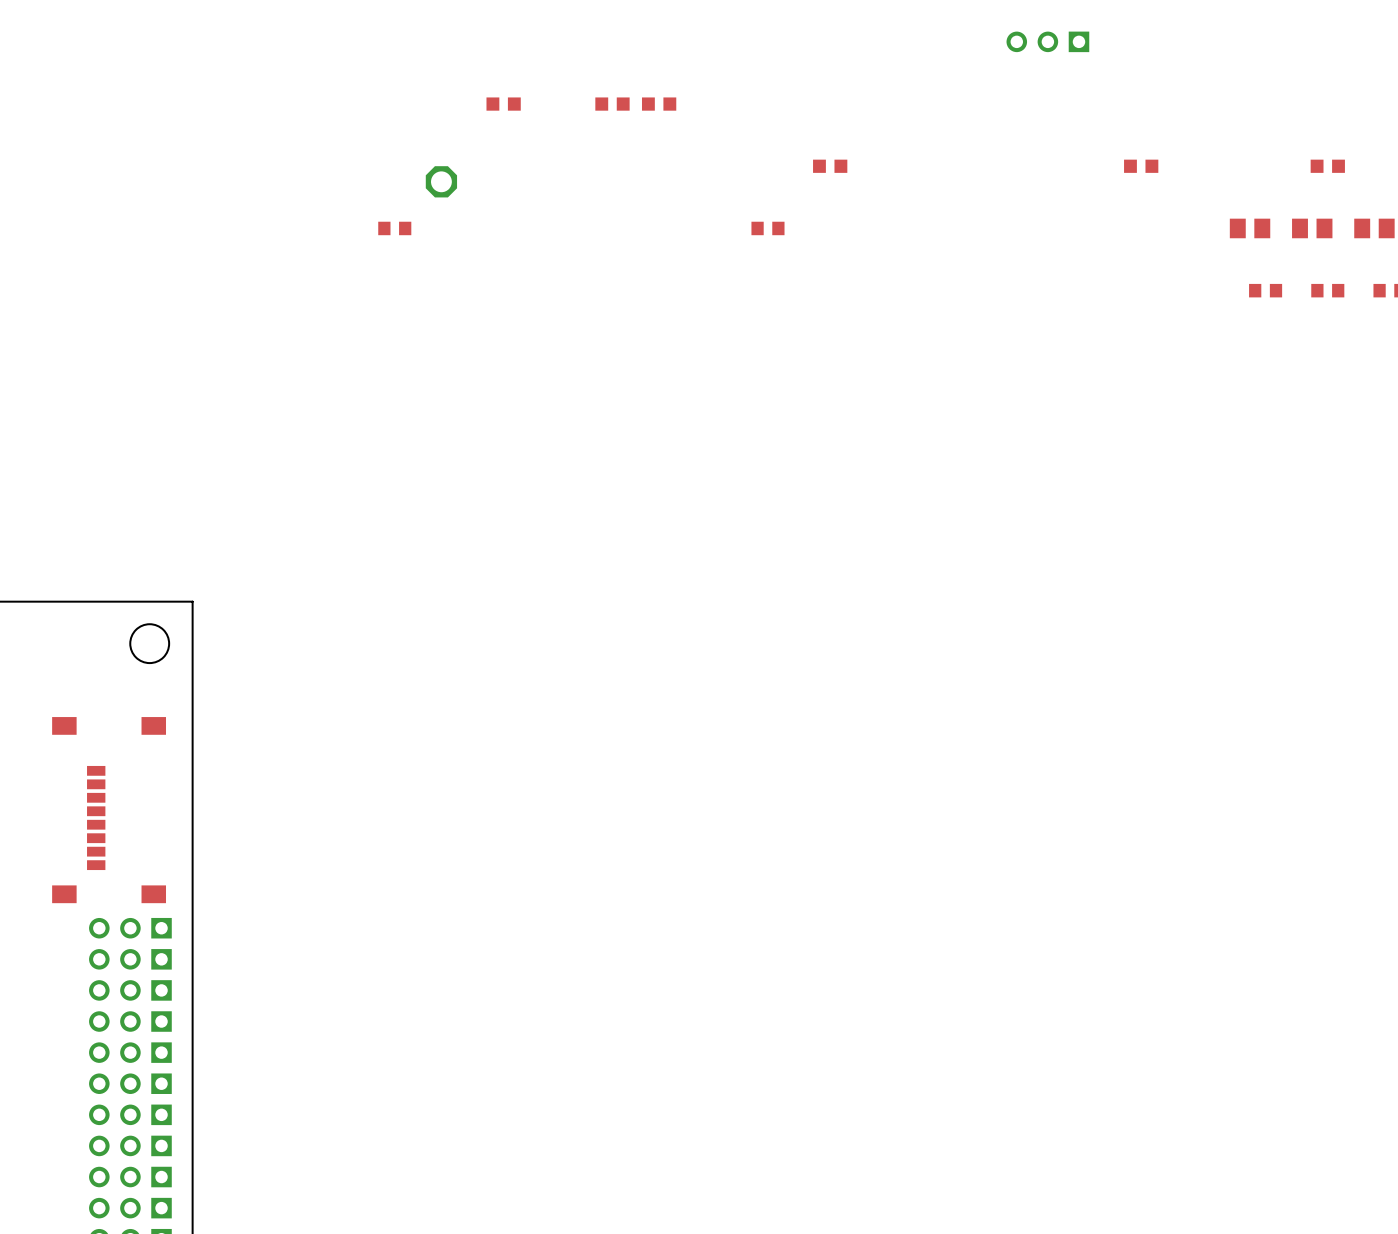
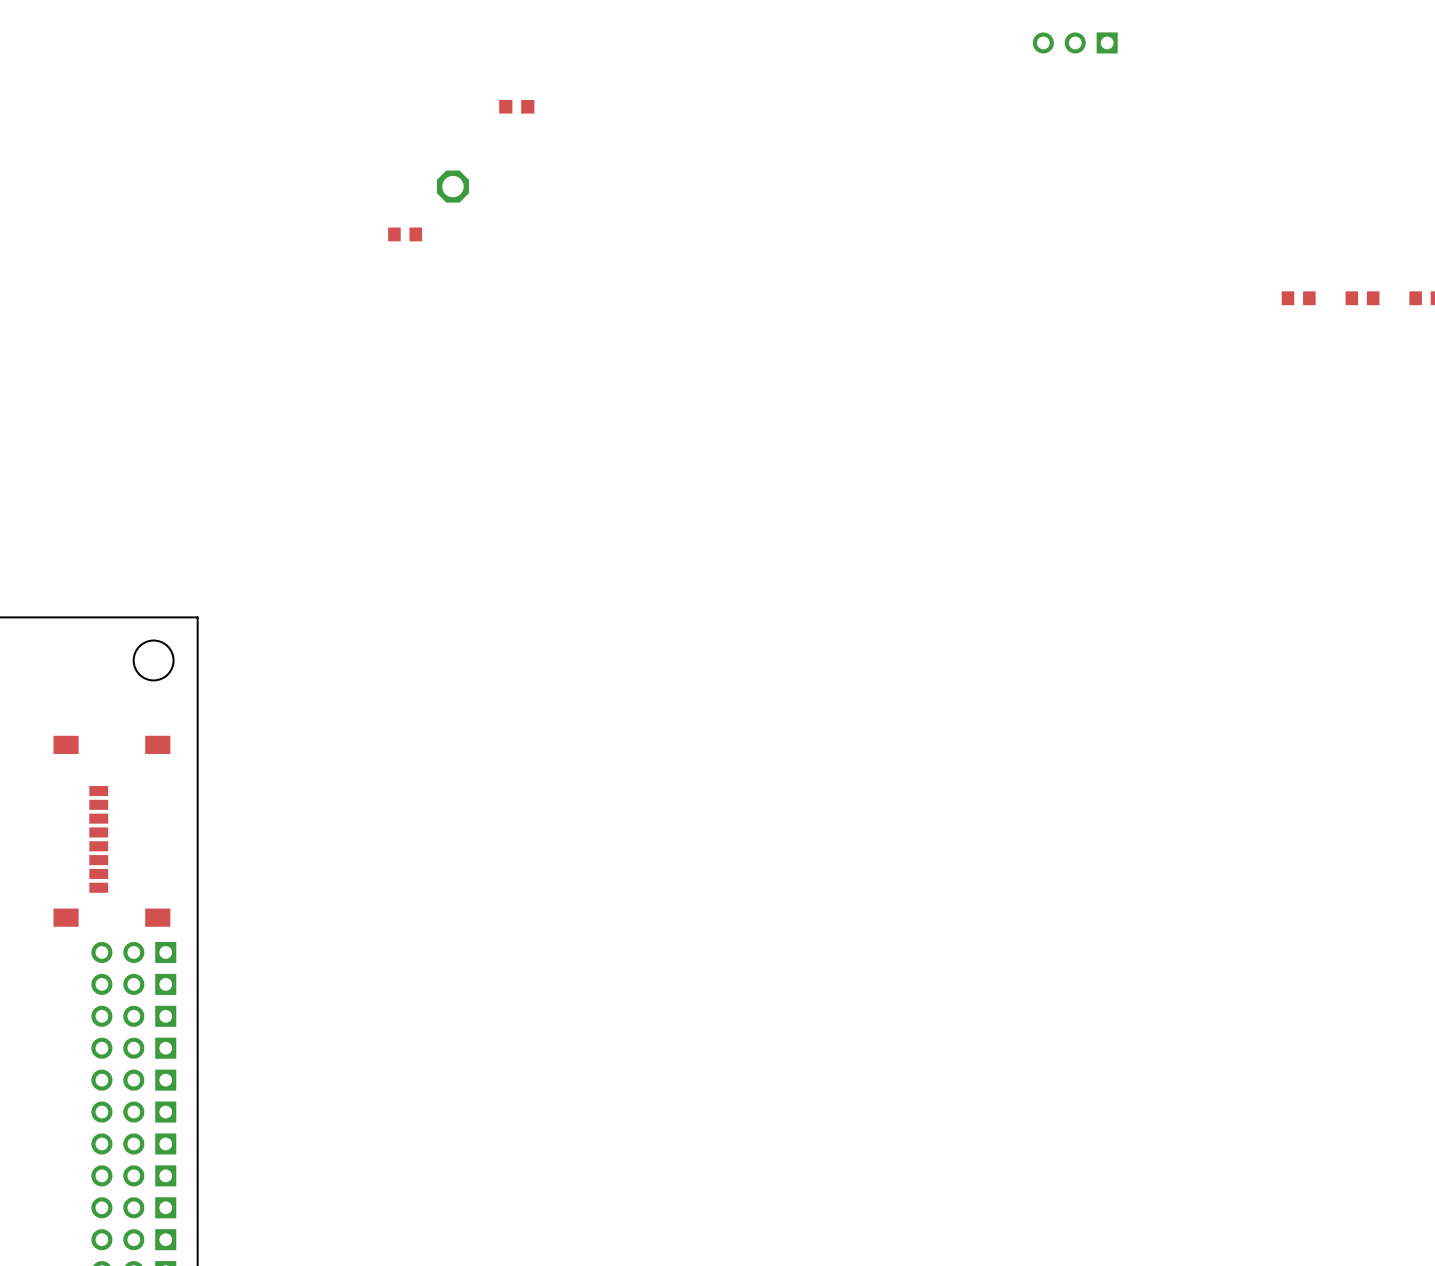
part: (612, 104) -> none
part: (659, 104) -> none
part: (830, 166) -> none
part: (1141, 166) -> none
part: (1327, 166) -> none
part: (767, 228) -> none
part: (1250, 228) -> none
part: (1312, 228) -> none
part: (1374, 228) -> none

